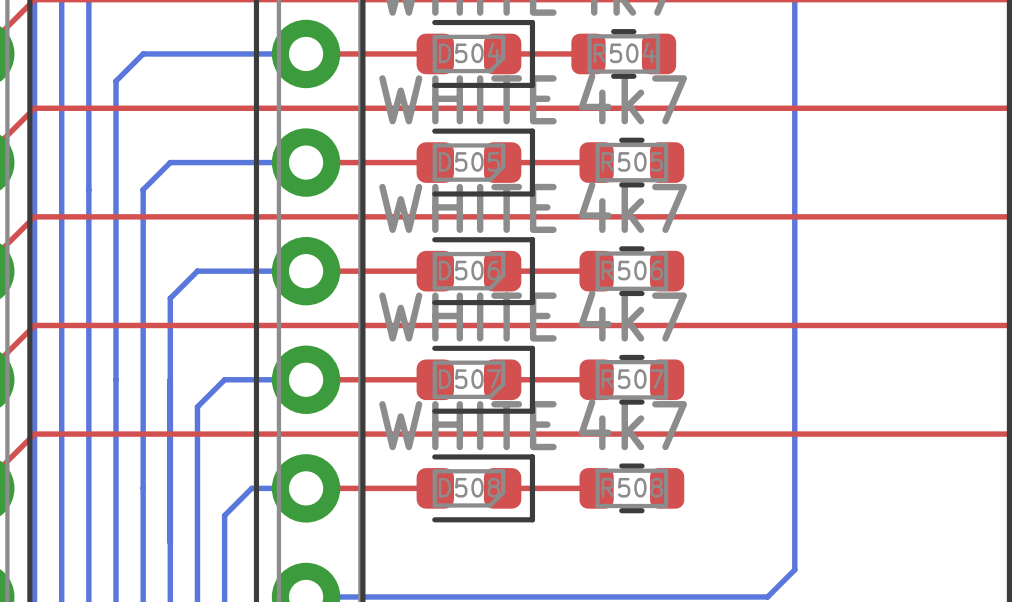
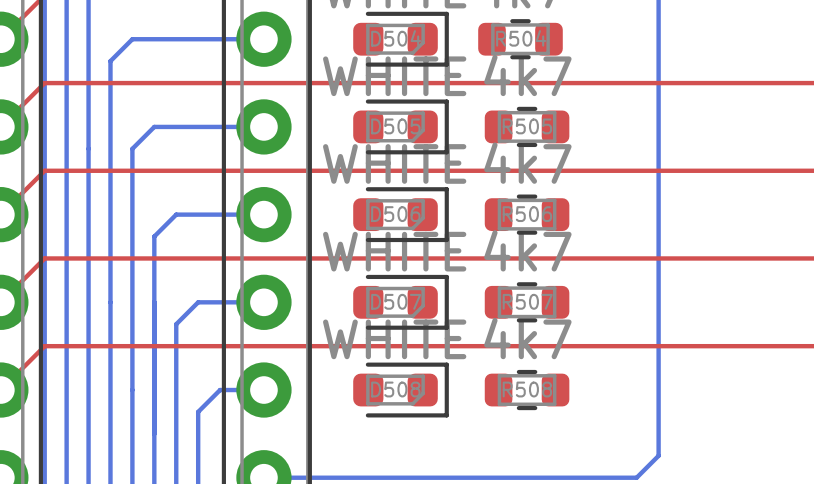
top track: (306, 53) (435, 53) -> none
top track: (502, 53) (588, 53) -> none
top track: (306, 162) (435, 162) -> none
top track: (502, 162) (596, 162) -> none
top track: (306, 271) (435, 271) -> none
top track: (502, 271) (596, 271) -> none
top track: (306, 379) (435, 379) -> none
top track: (502, 379) (596, 379) -> none
top track: (306, 488) (435, 488) -> none
top track: (502, 488) (596, 488) -> none

